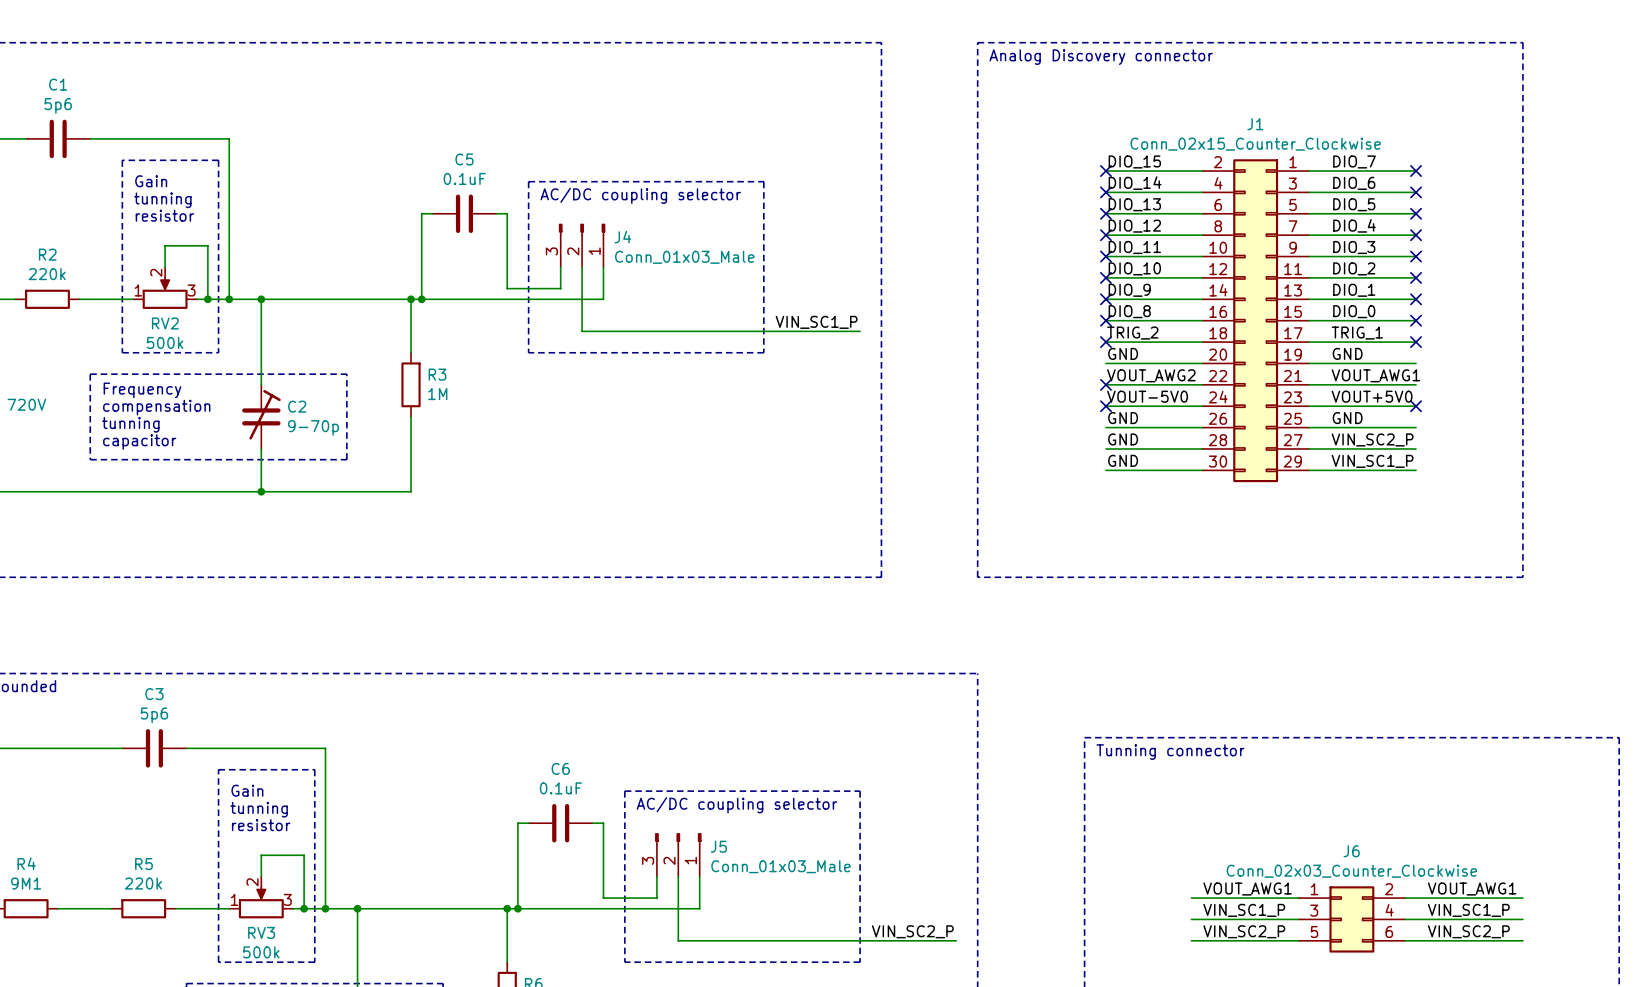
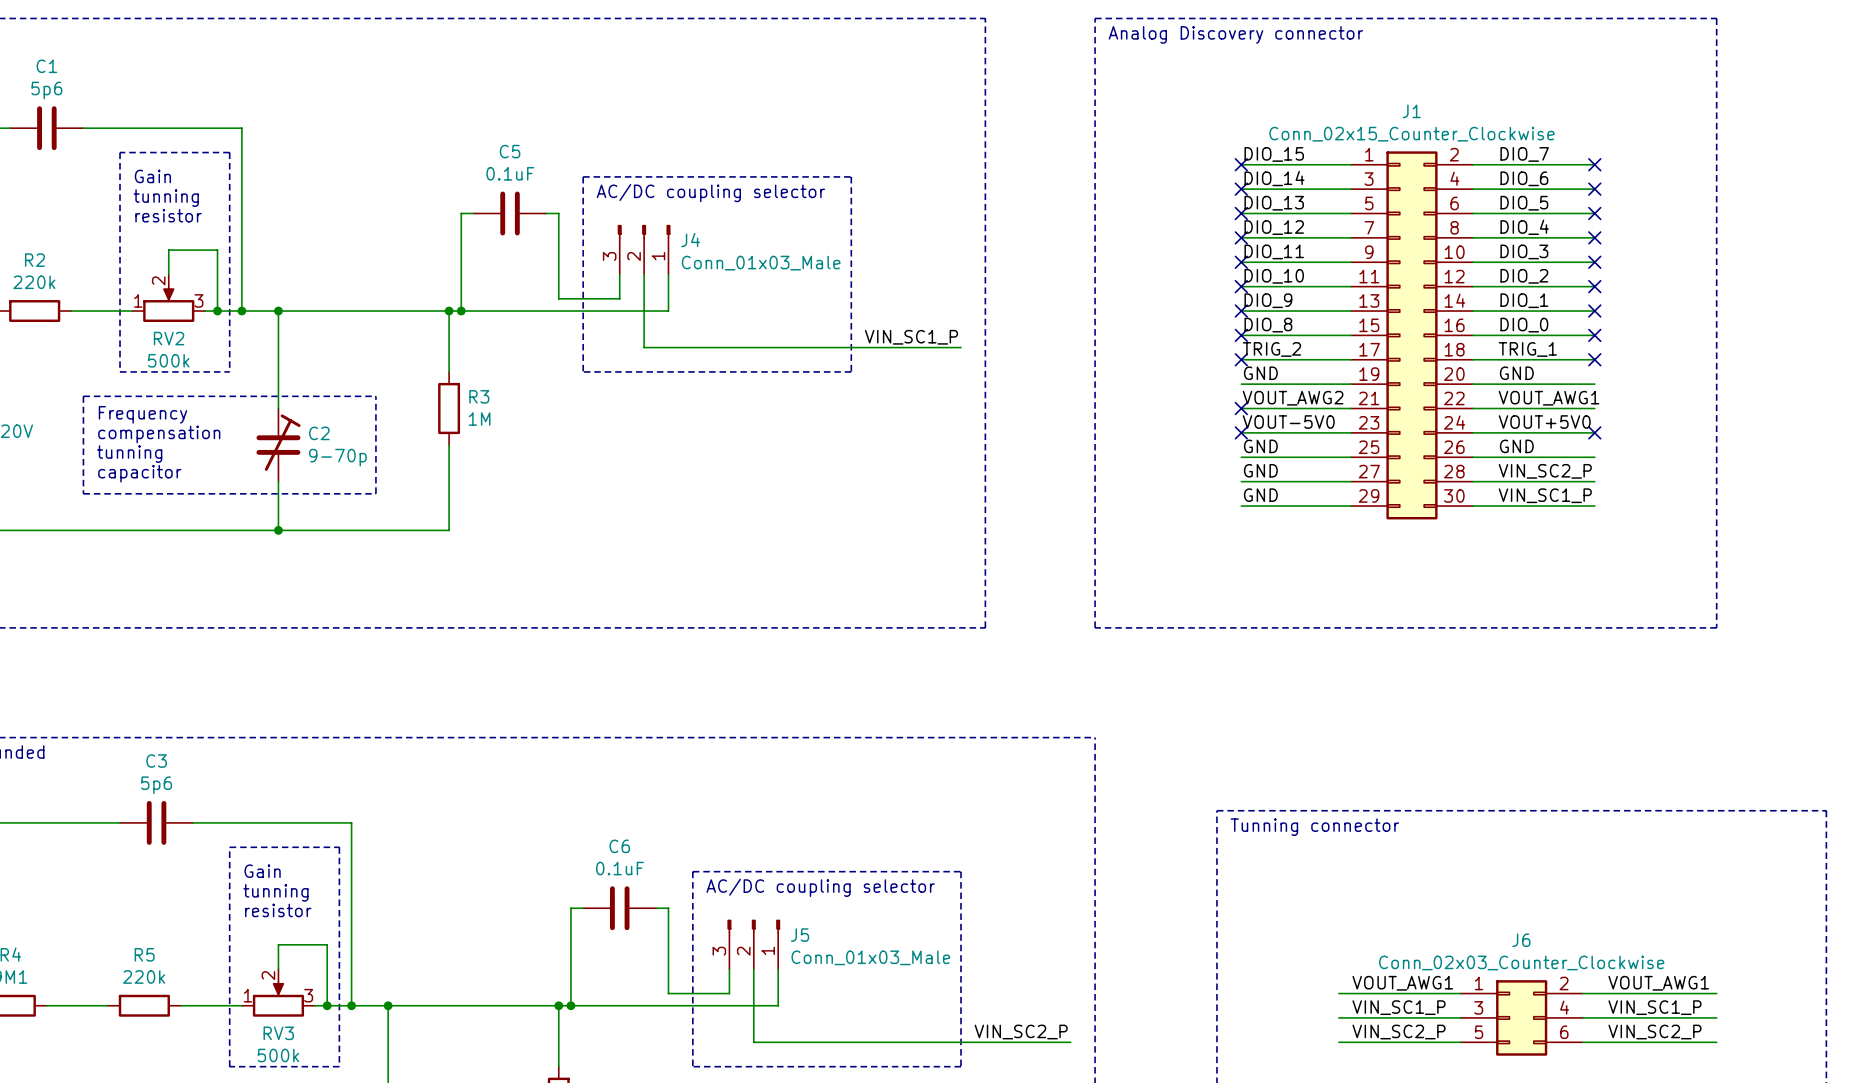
J1 flip: as is (1255, 320) -> left-right (1411, 335)

